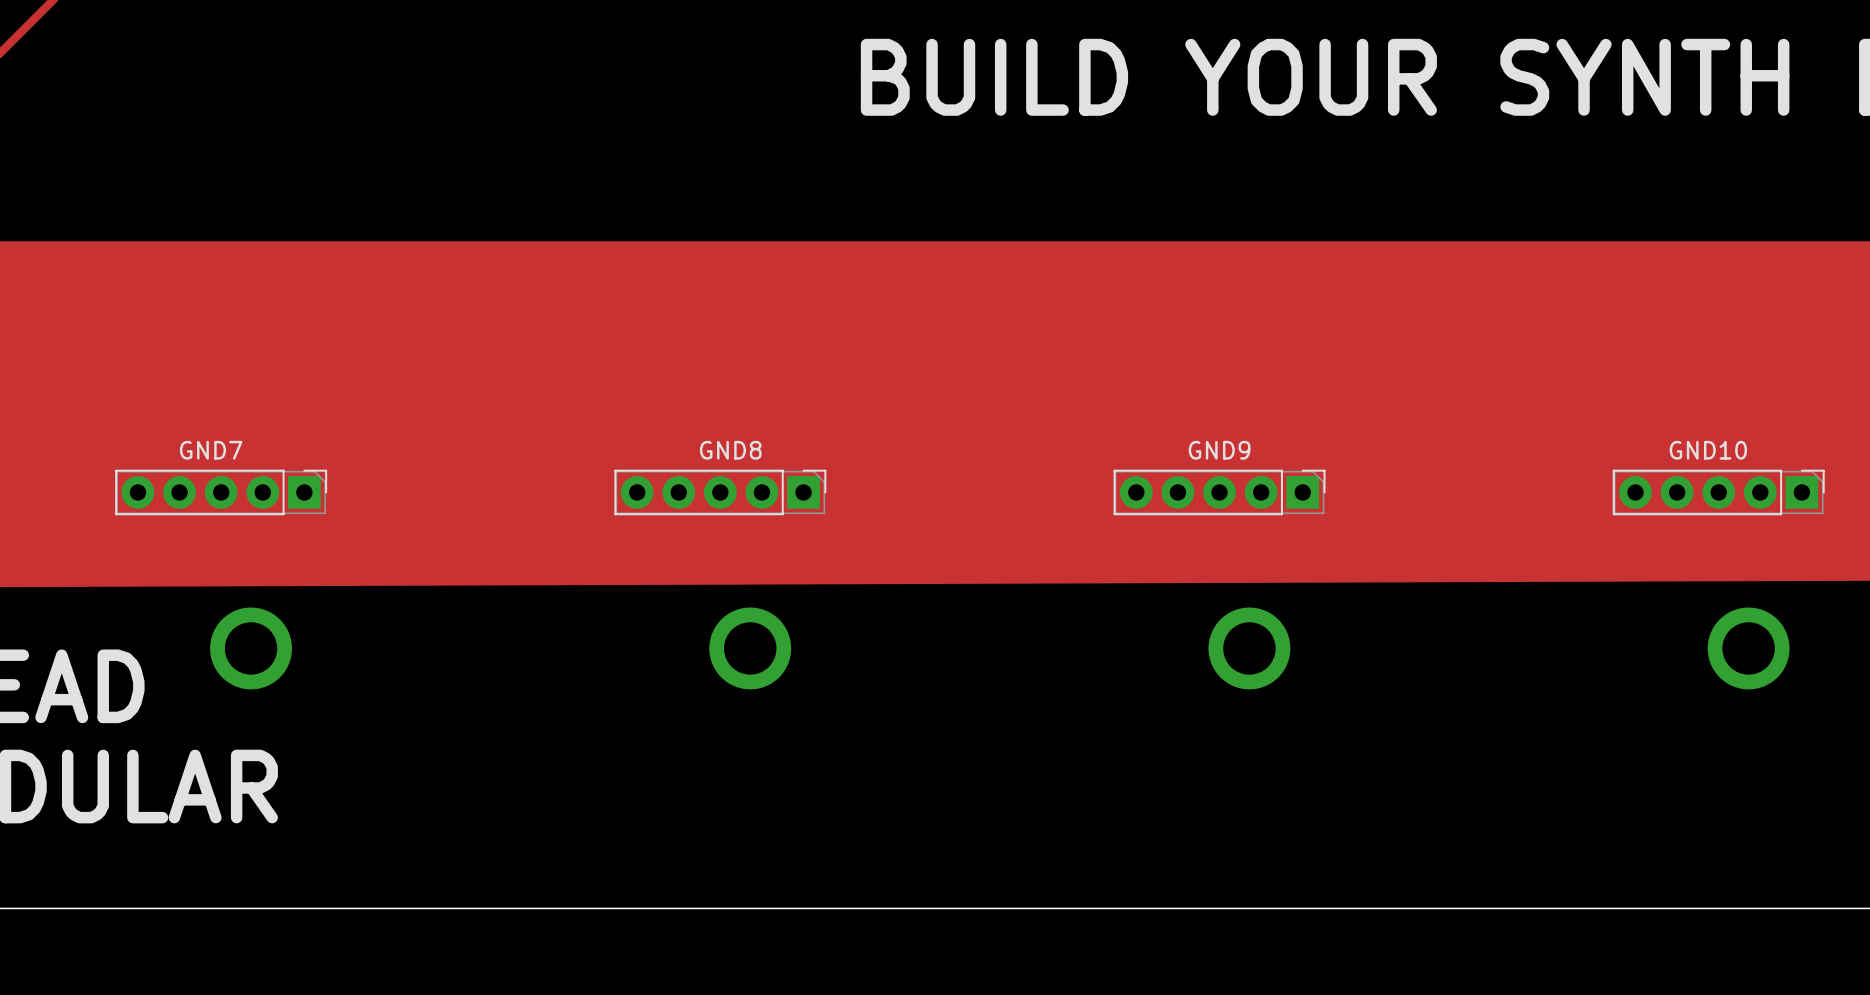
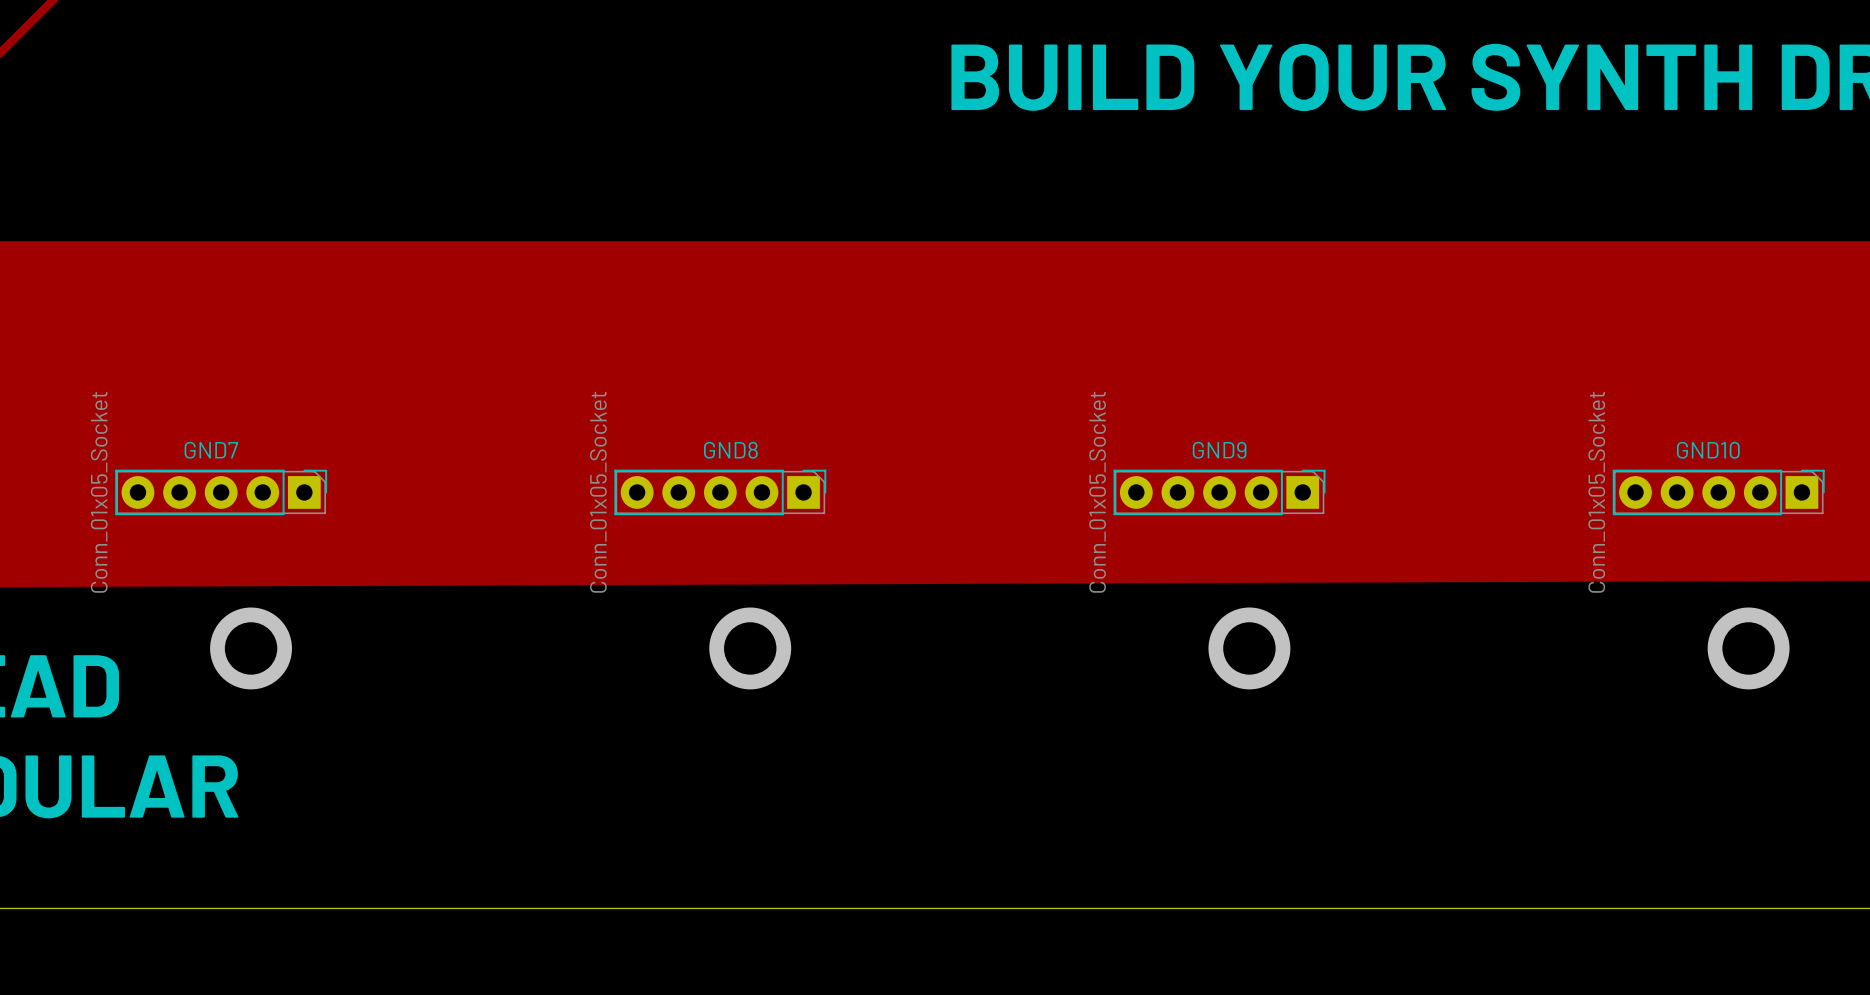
GND7 value: none -> Conn_01x05_Socket (99, 492)
GND8 value: none -> Conn_01x05_Socket (598, 492)
GND9 value: none -> Conn_01x05_Socket (1097, 492)
GND10 value: none -> Conn_01x05_Socket (1596, 492)

